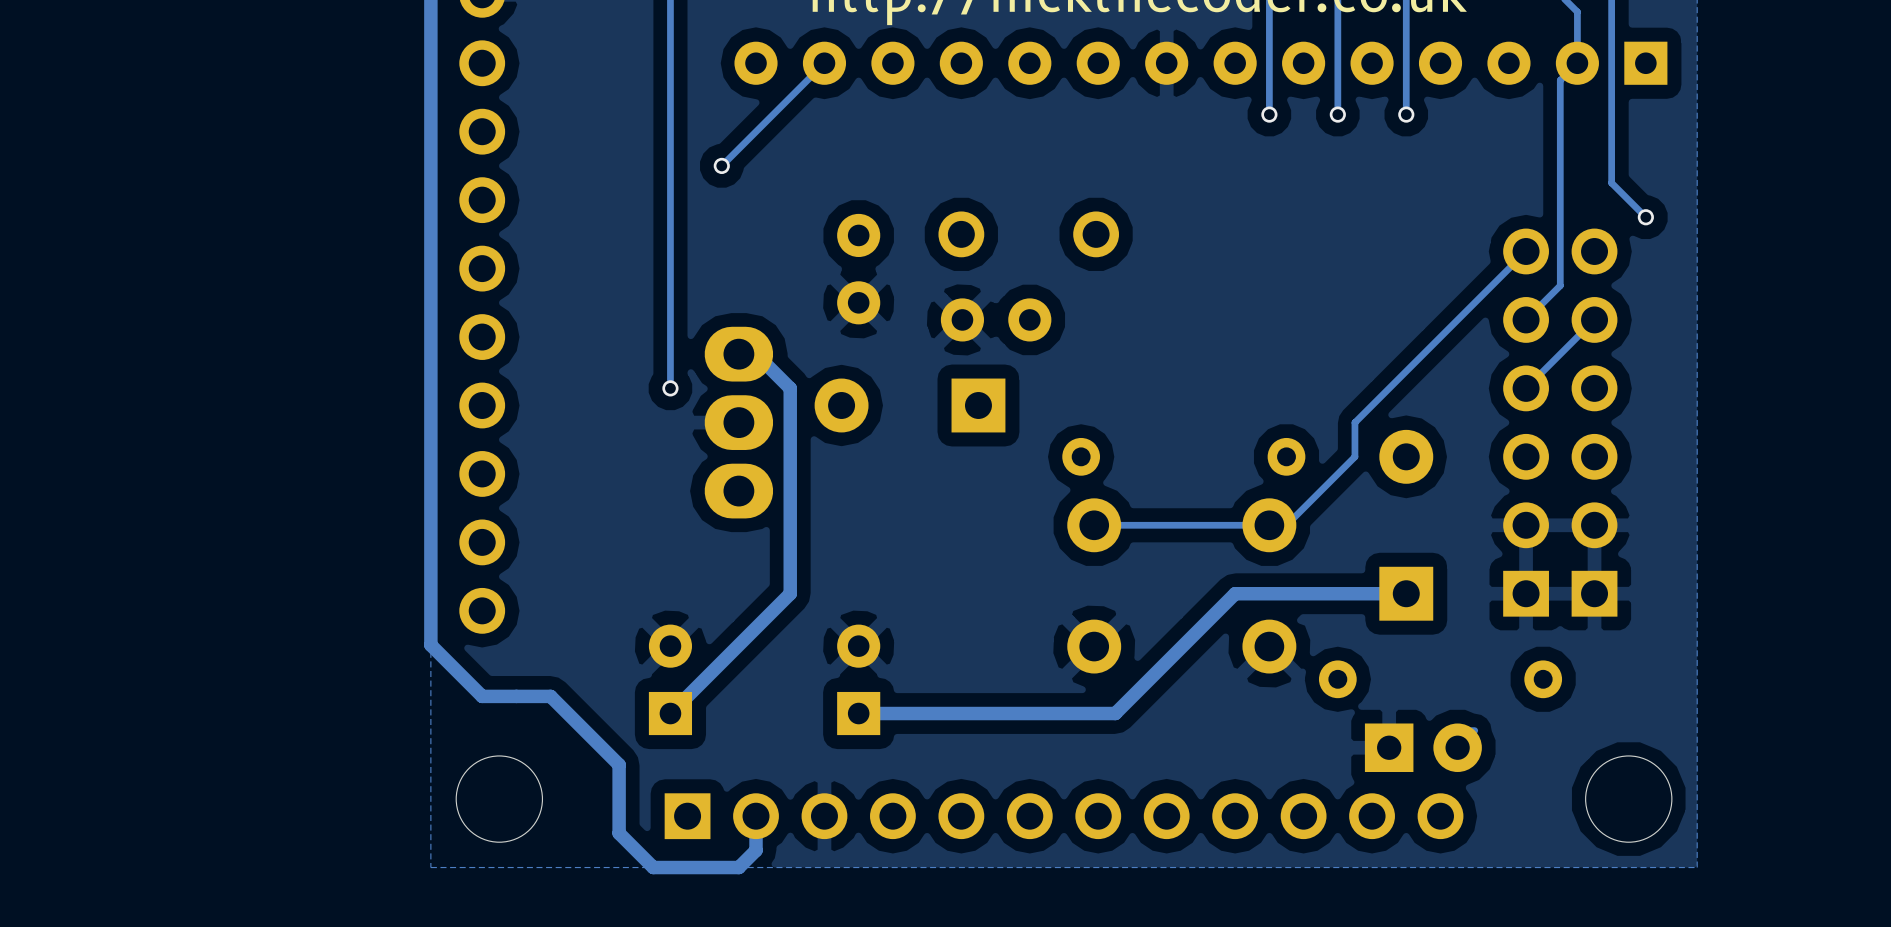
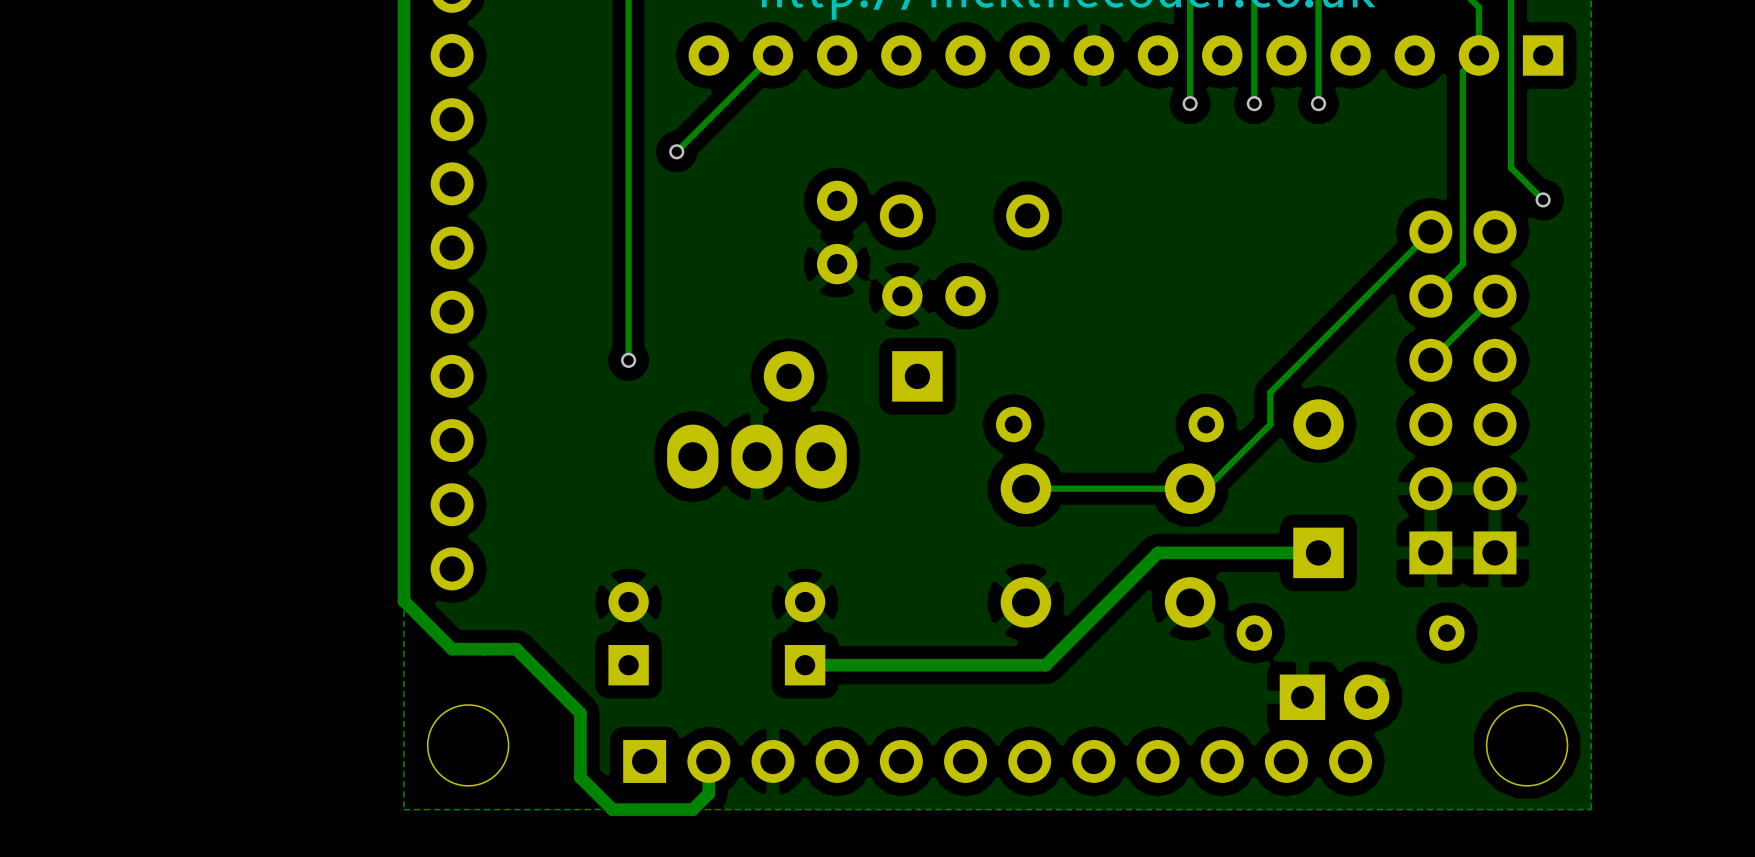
part position: (858, 269) -> (837, 232)
track: (738, 354) (756, 354) (790, 388) (790, 593) (670, 713) -> none
part rotation: 0° (738, 422) -> 90° clockwise (756, 456)

